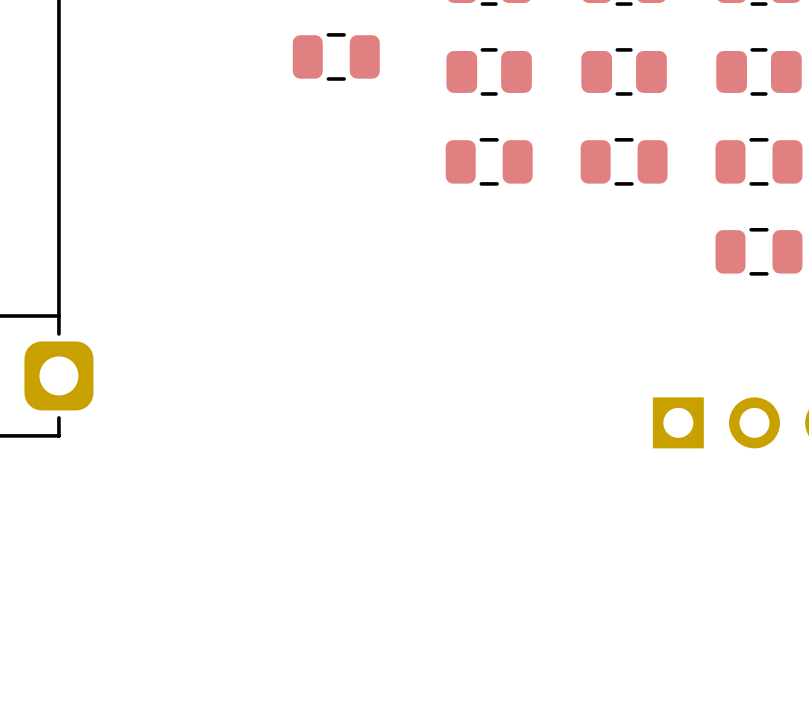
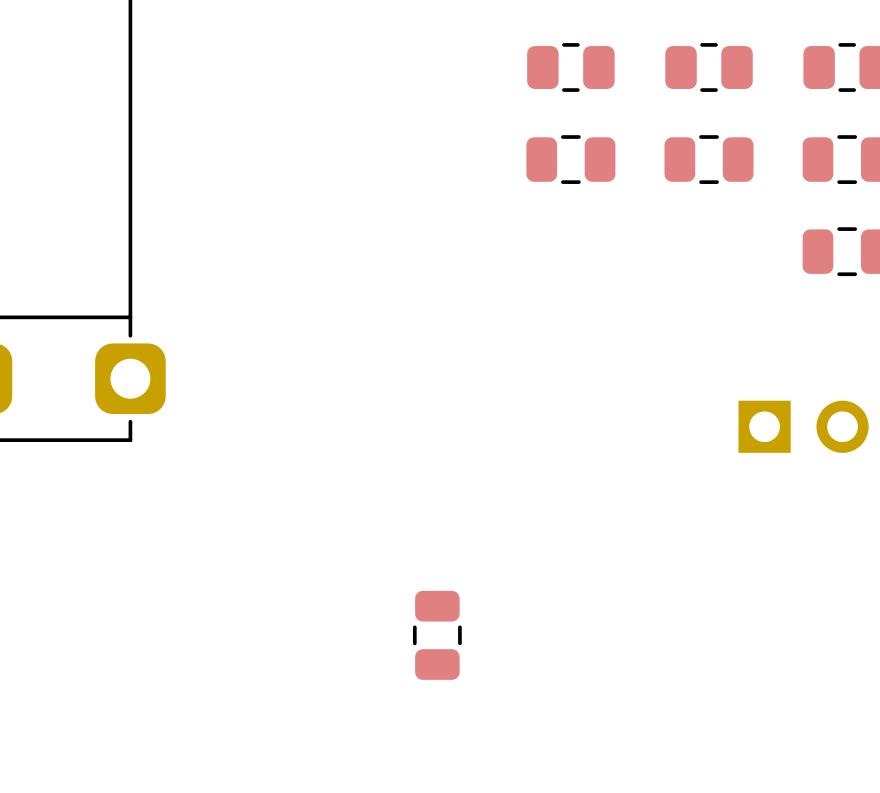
part rotation: 0° (336, 56) -> 90° clockwise (437, 635)
part position: (336, 56) -> (437, 635)

